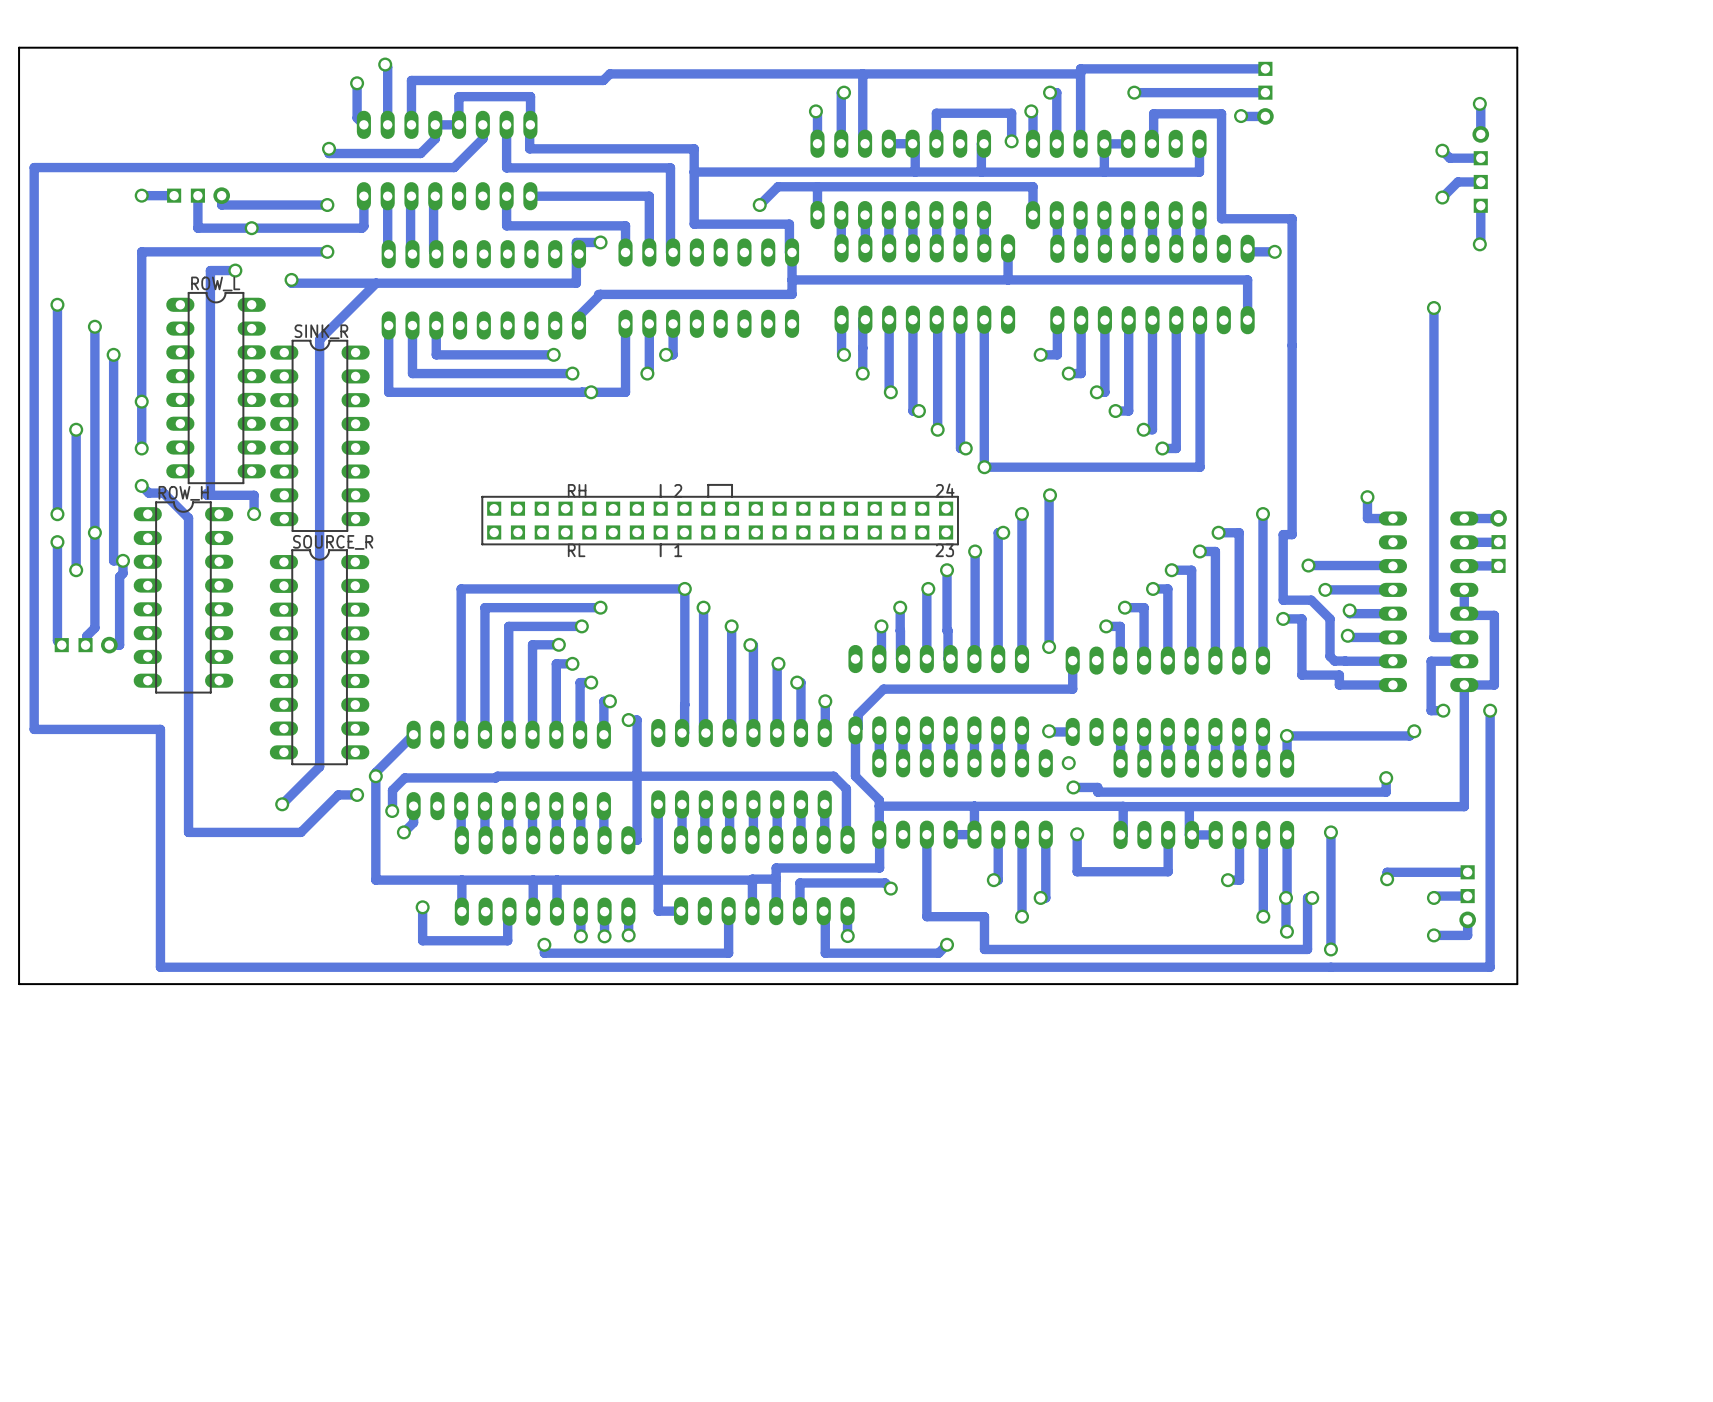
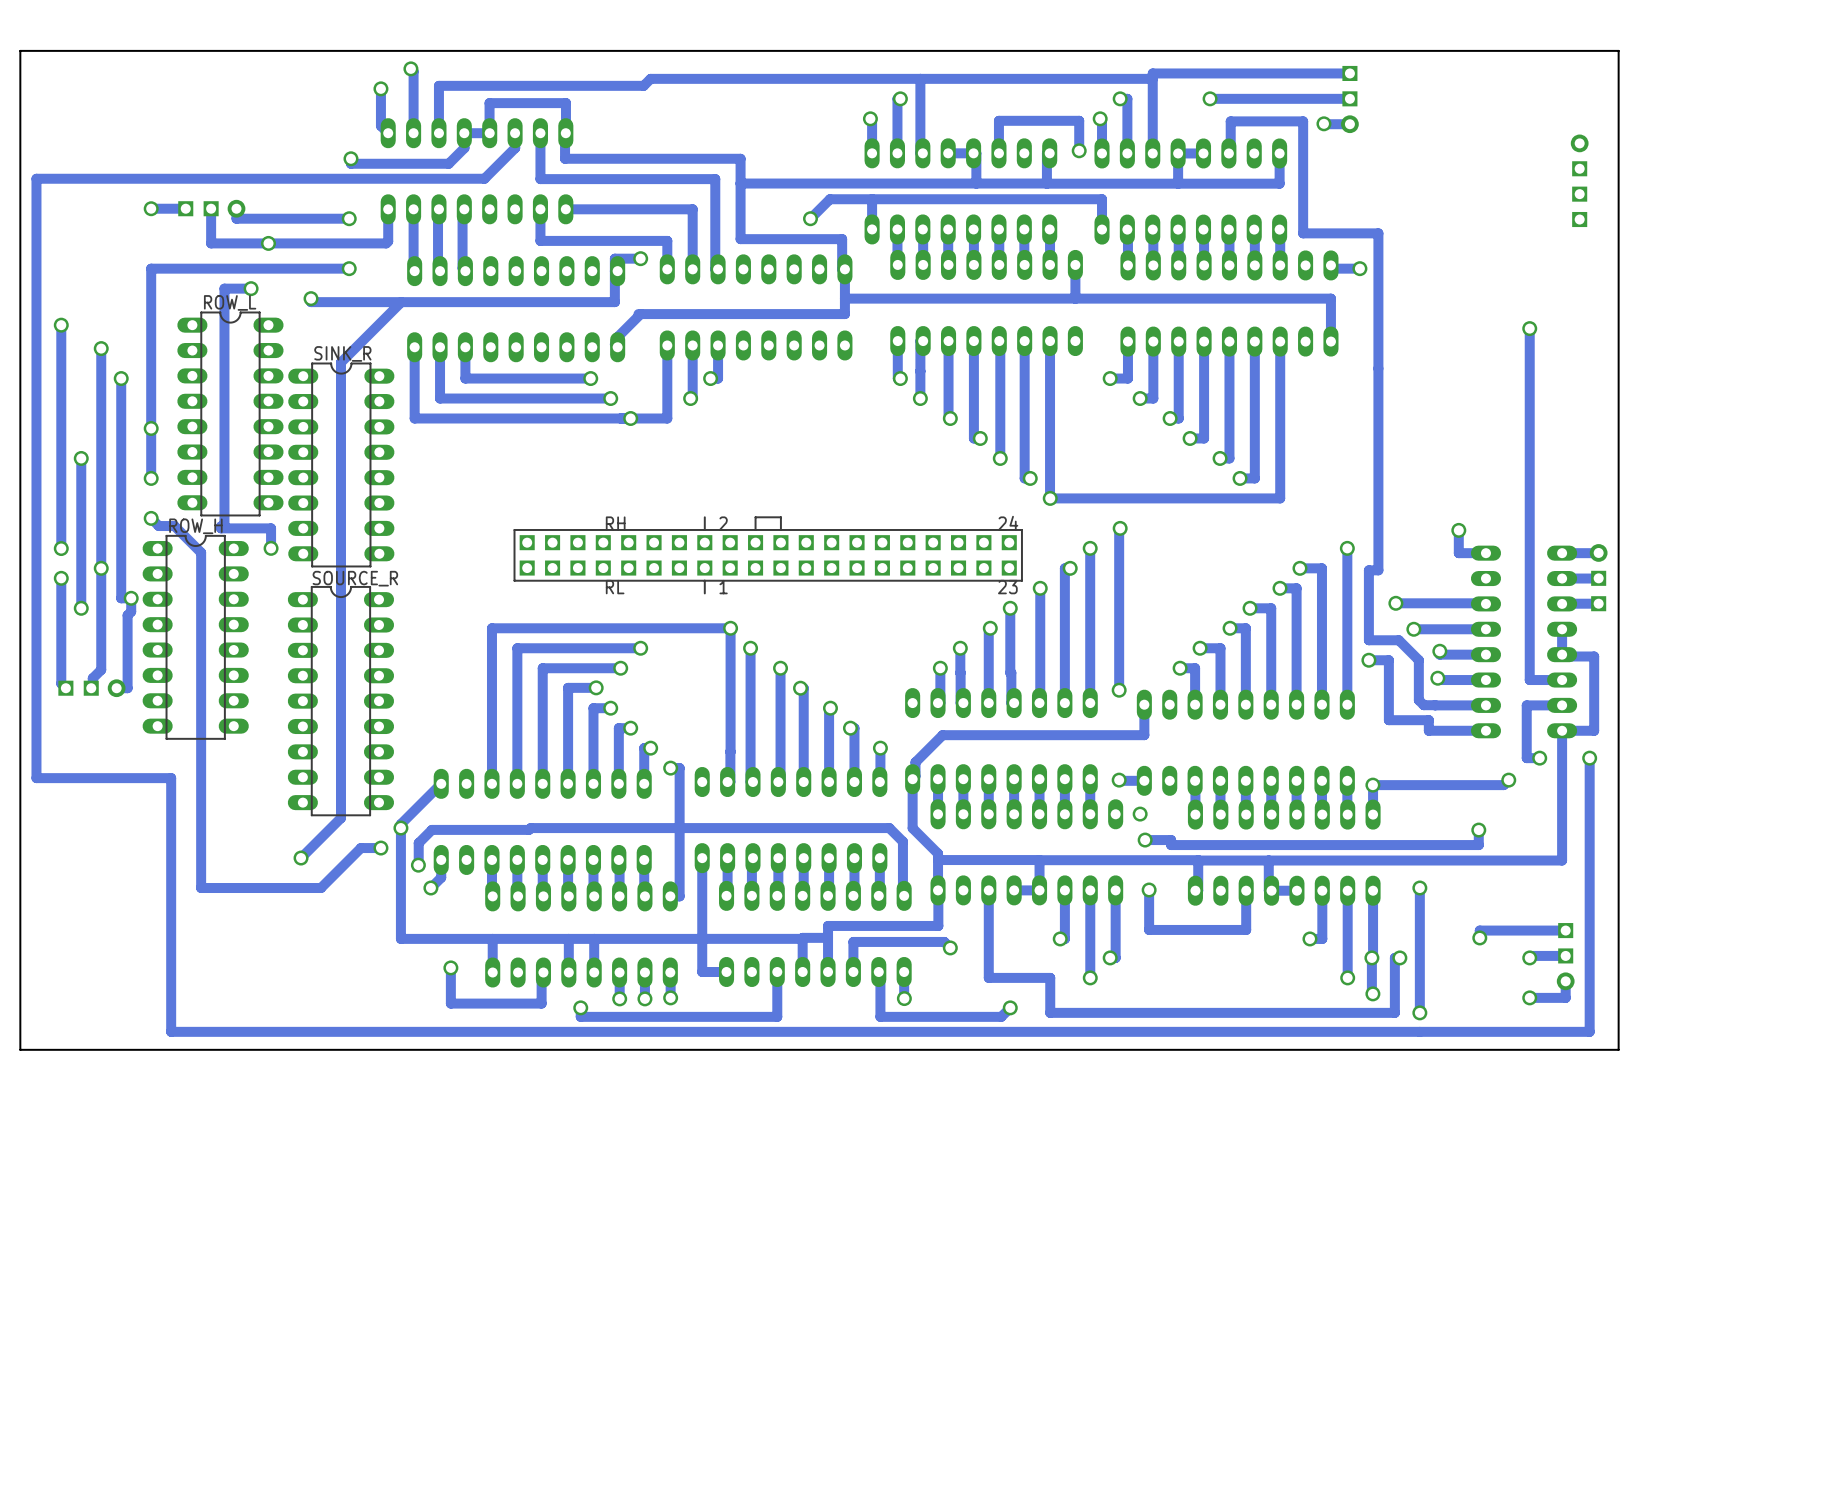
track: (1479, 103) (1480, 134) -> none
via: (1479, 103) -> none
track: (1442, 150) (1449, 158) (1480, 158) -> none
via: (1442, 150) -> none
track: (1480, 181) (1457, 181) (1442, 197) -> none
via: (1442, 197) -> none
track: (1480, 205) (1479, 244) -> none
via: (1479, 244) -> none

